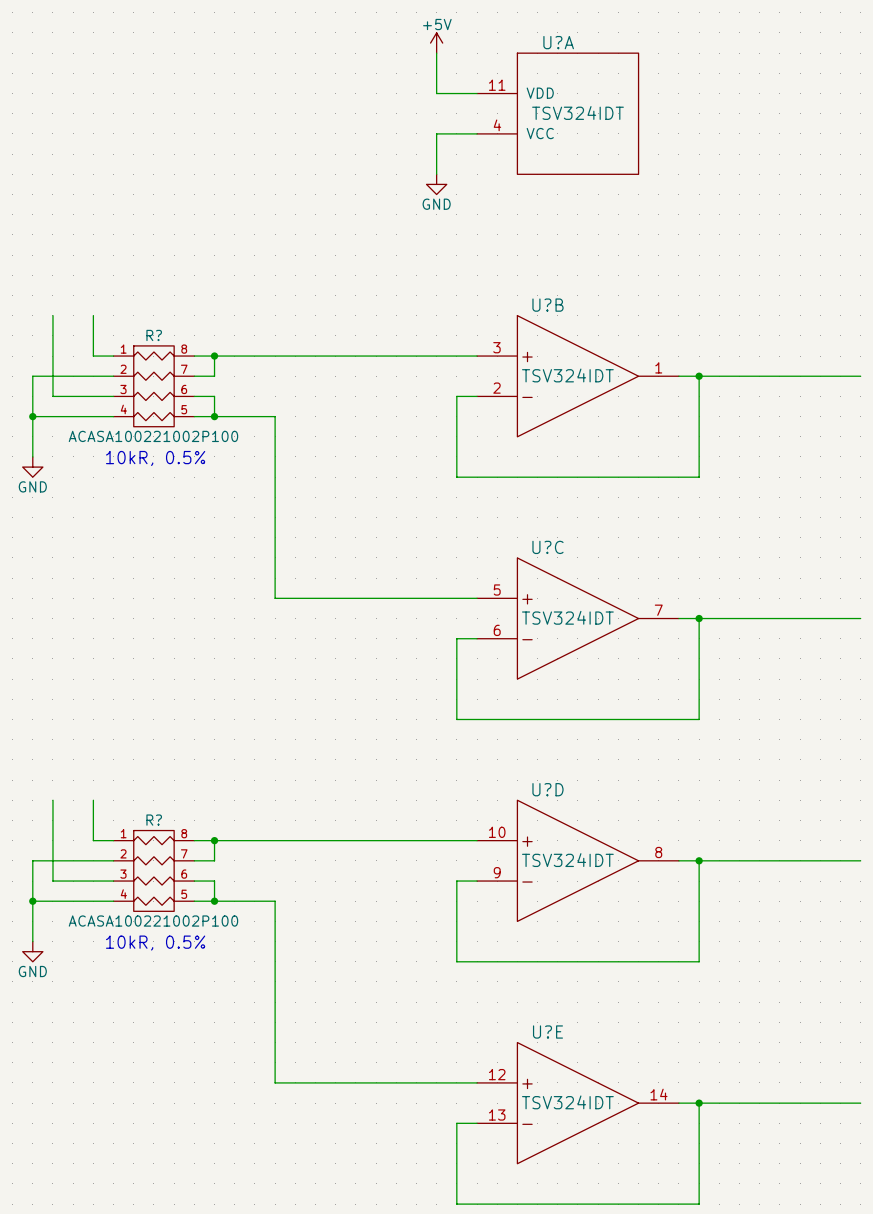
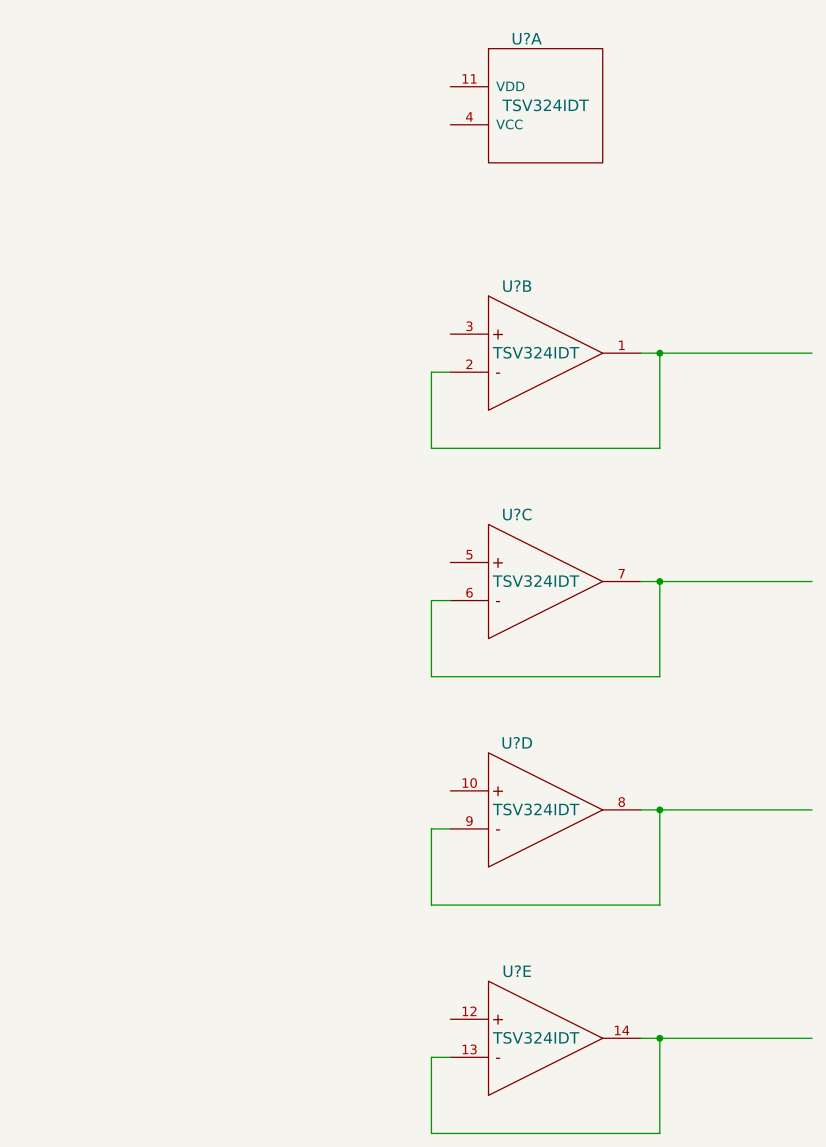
power symbol: +5V (436, 43) -> none
wire: (436, 53) (436, 93) (477, 93) -> none
wire: (477, 133) (436, 133) (436, 174) -> none
power symbol: GND (436, 184) -> none
wire: (52, 315) (52, 396) (113, 396) -> none
wire: (93, 315) (93, 356) (113, 356) -> none
wire: (194, 356) (477, 356) -> none
wire: (214, 356) (214, 376) (194, 376) -> none
junction: (214, 356) -> none
wire: (113, 376) (32, 376) (32, 456) -> none
R?: ACASA100221002P100 (153, 386) -> none
wire: (194, 396) (214, 396) (214, 416) -> none
wire: (32, 416) (113, 416) -> none
junction: (32, 416) -> none
wire: (194, 416) (275, 416) (275, 598) (477, 598) -> none
junction: (214, 416) -> none
text: 10kR, 0.5% (155, 458) -> none
power symbol: GND (32, 467) -> none
wire: (52, 800) (52, 881) (113, 881) -> none
wire: (93, 800) (93, 840) (113, 840) -> none
wire: (194, 840) (477, 840) -> none
wire: (214, 840) (214, 860) (194, 860) -> none
junction: (214, 840) -> none
wire: (113, 860) (32, 860) (32, 941) -> none
R?: ACASA100221002P100 (153, 870) -> none
wire: (194, 881) (214, 881) (214, 901) -> none
wire: (32, 901) (113, 901) -> none
junction: (32, 901) -> none
wire: (194, 901) (275, 901) (275, 1082) (477, 1082) -> none
junction: (214, 901) -> none
text: 10kR, 0.5% (155, 943) -> none
power symbol: GND (32, 951) -> none

